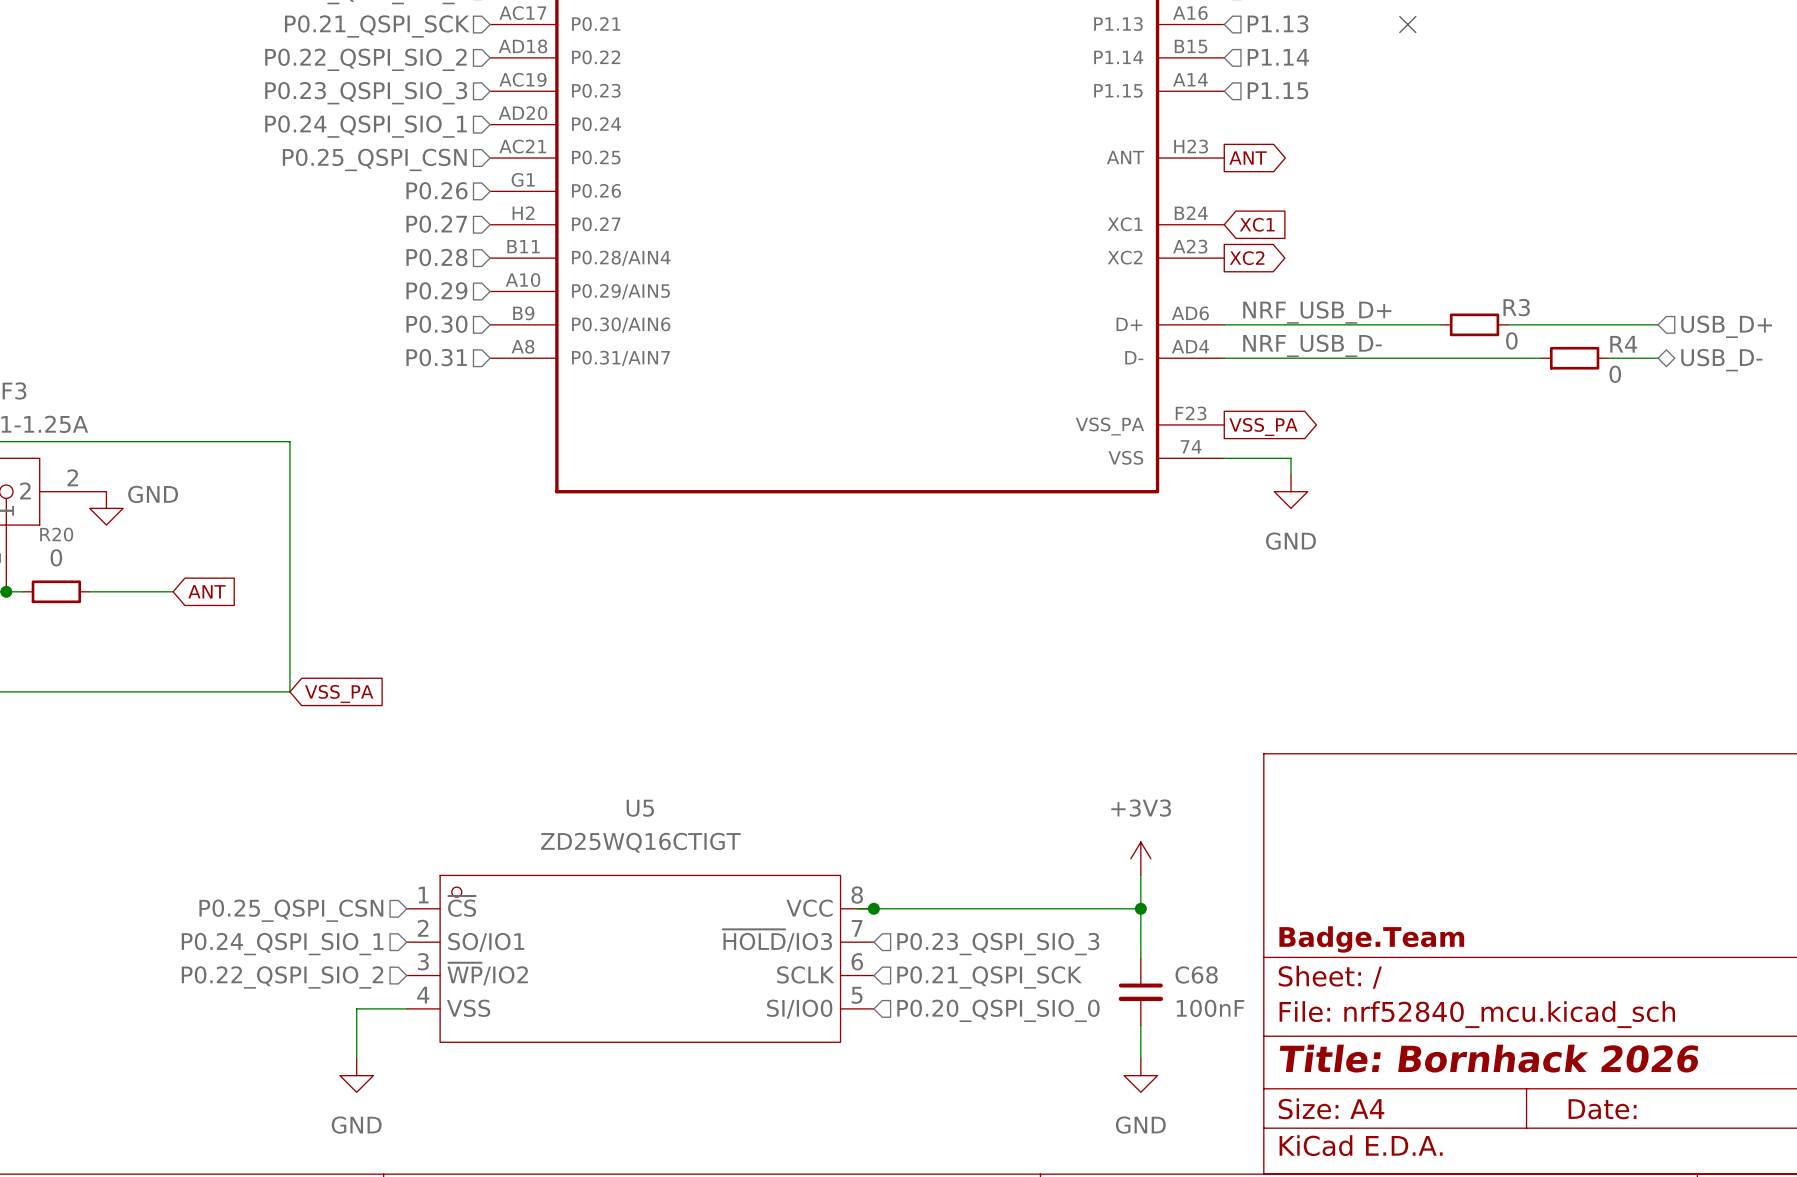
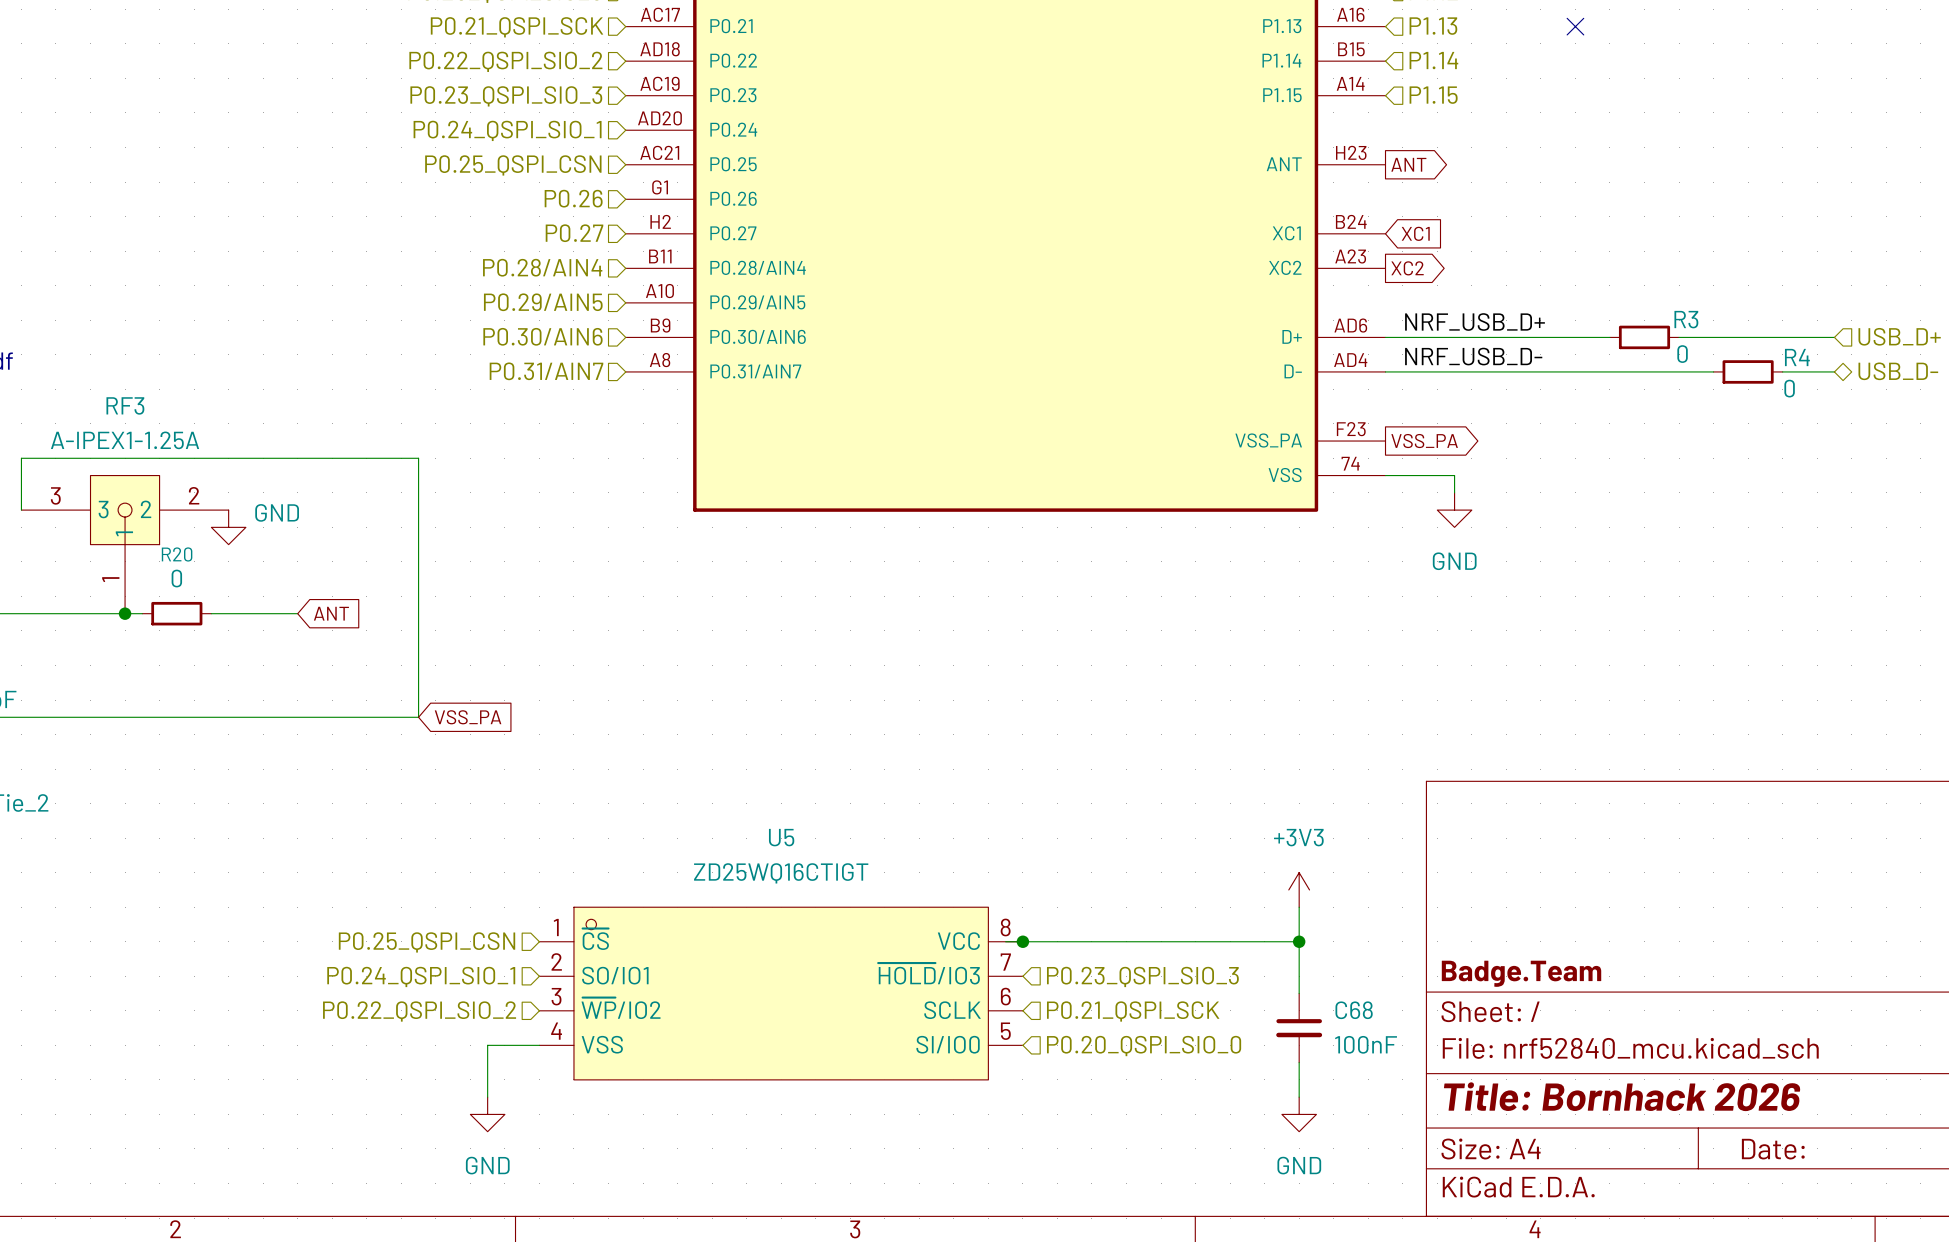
hierarchical label: P0.28 (436, 257) -> P0.28/AIN4 (542, 267)
hierarchical label: P0.29 (436, 290) -> P0.29/AIN5 (543, 302)
hierarchical label: P0.30 (436, 324) -> P0.30/AIN6 (542, 336)
hierarchical label: P0.31 (436, 357) -> P0.31/AIN7 (546, 371)

